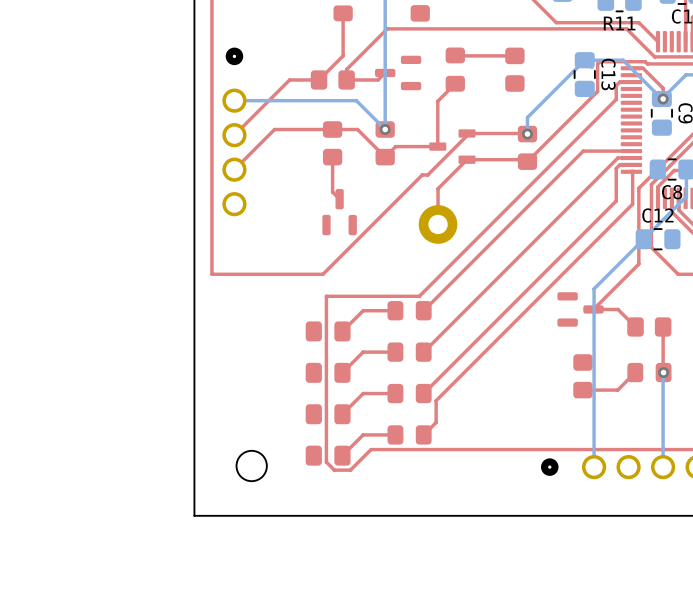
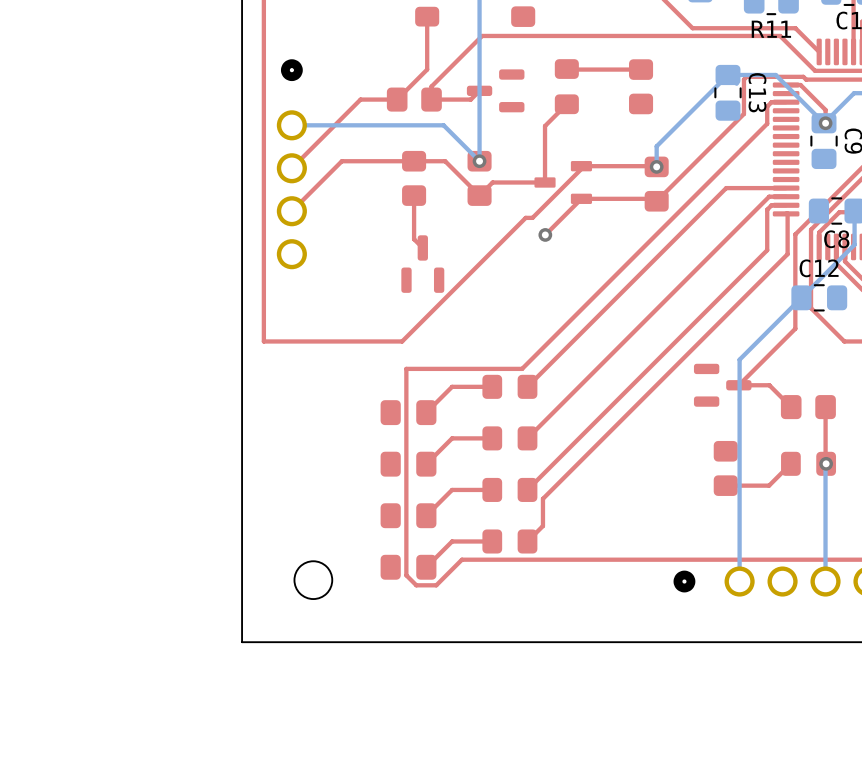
top track: (438, 188) (438, 224) -> none
via: none -> (545, 234)
part: (438, 224) -> none

